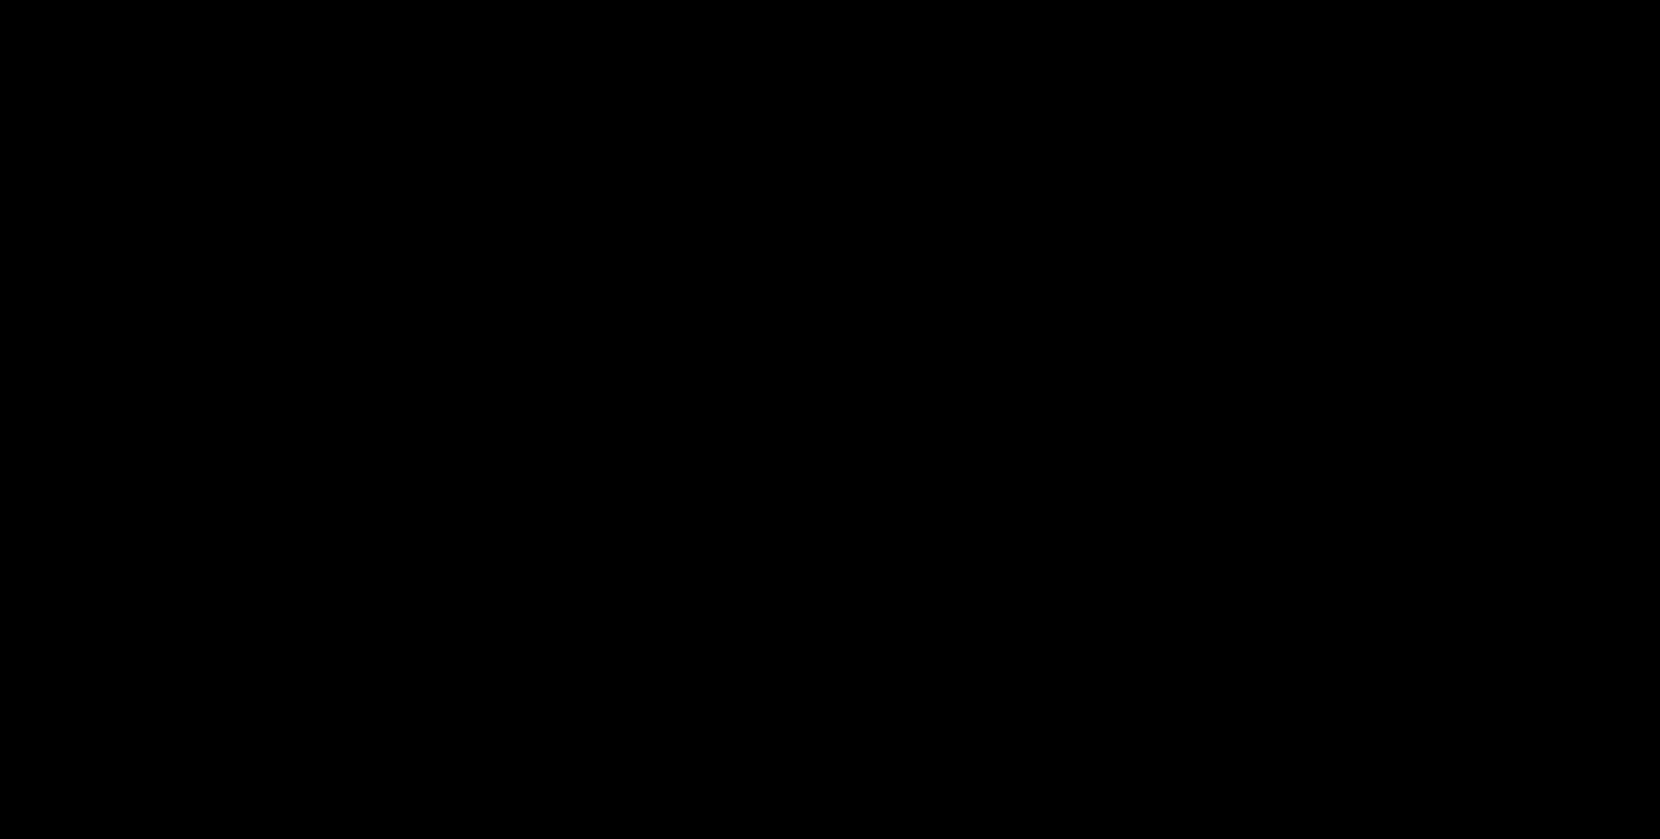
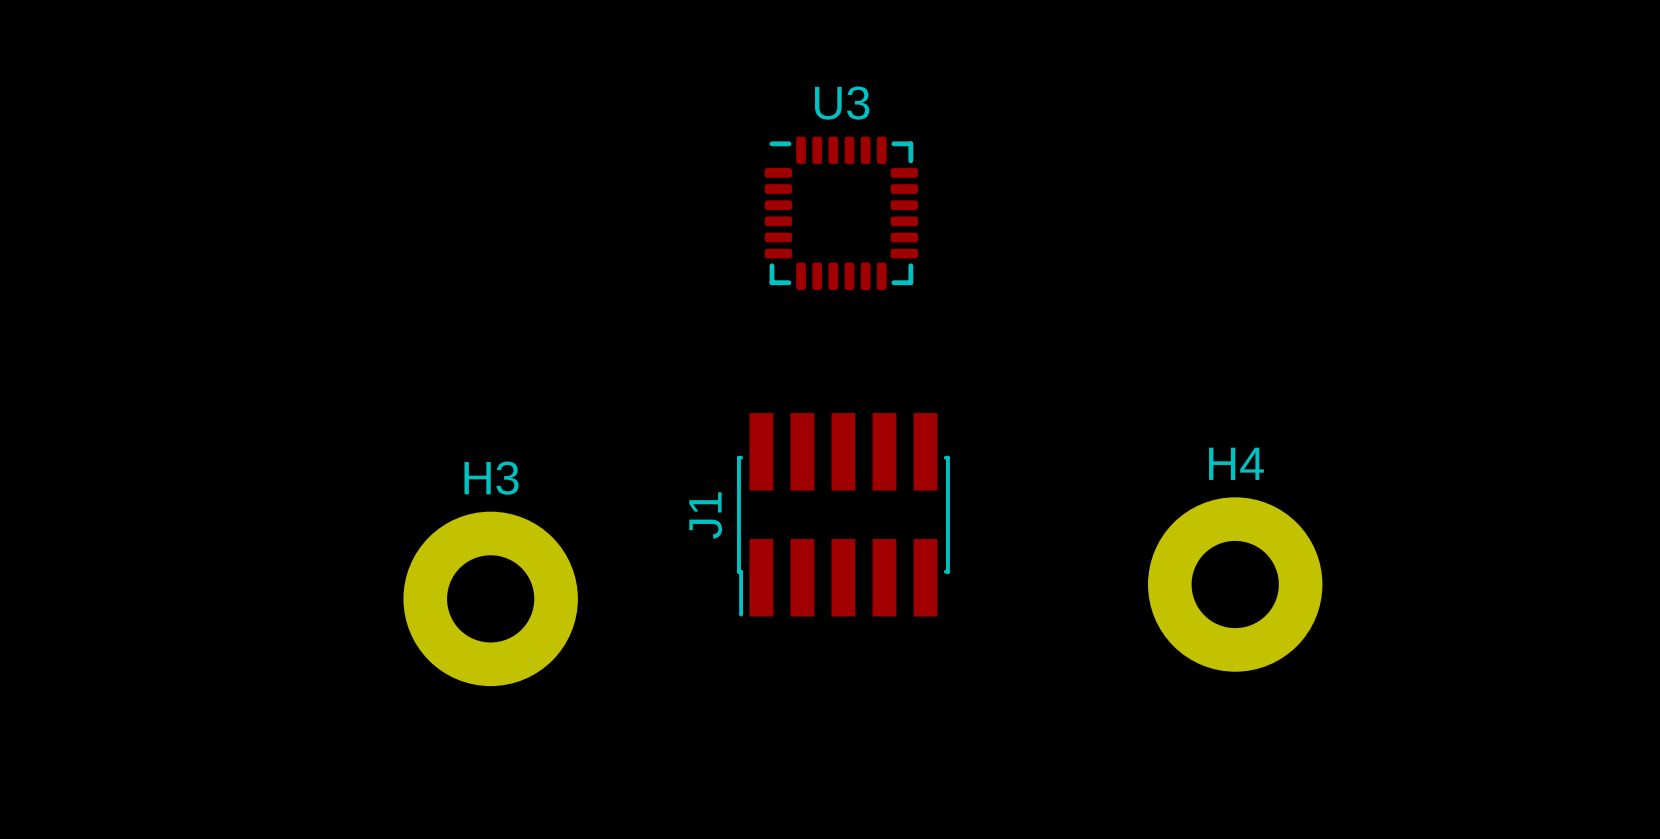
U3: none -> (841, 213)
J1: none -> (843, 514)
H4: none -> (1235, 584)
H3: none -> (490, 598)

